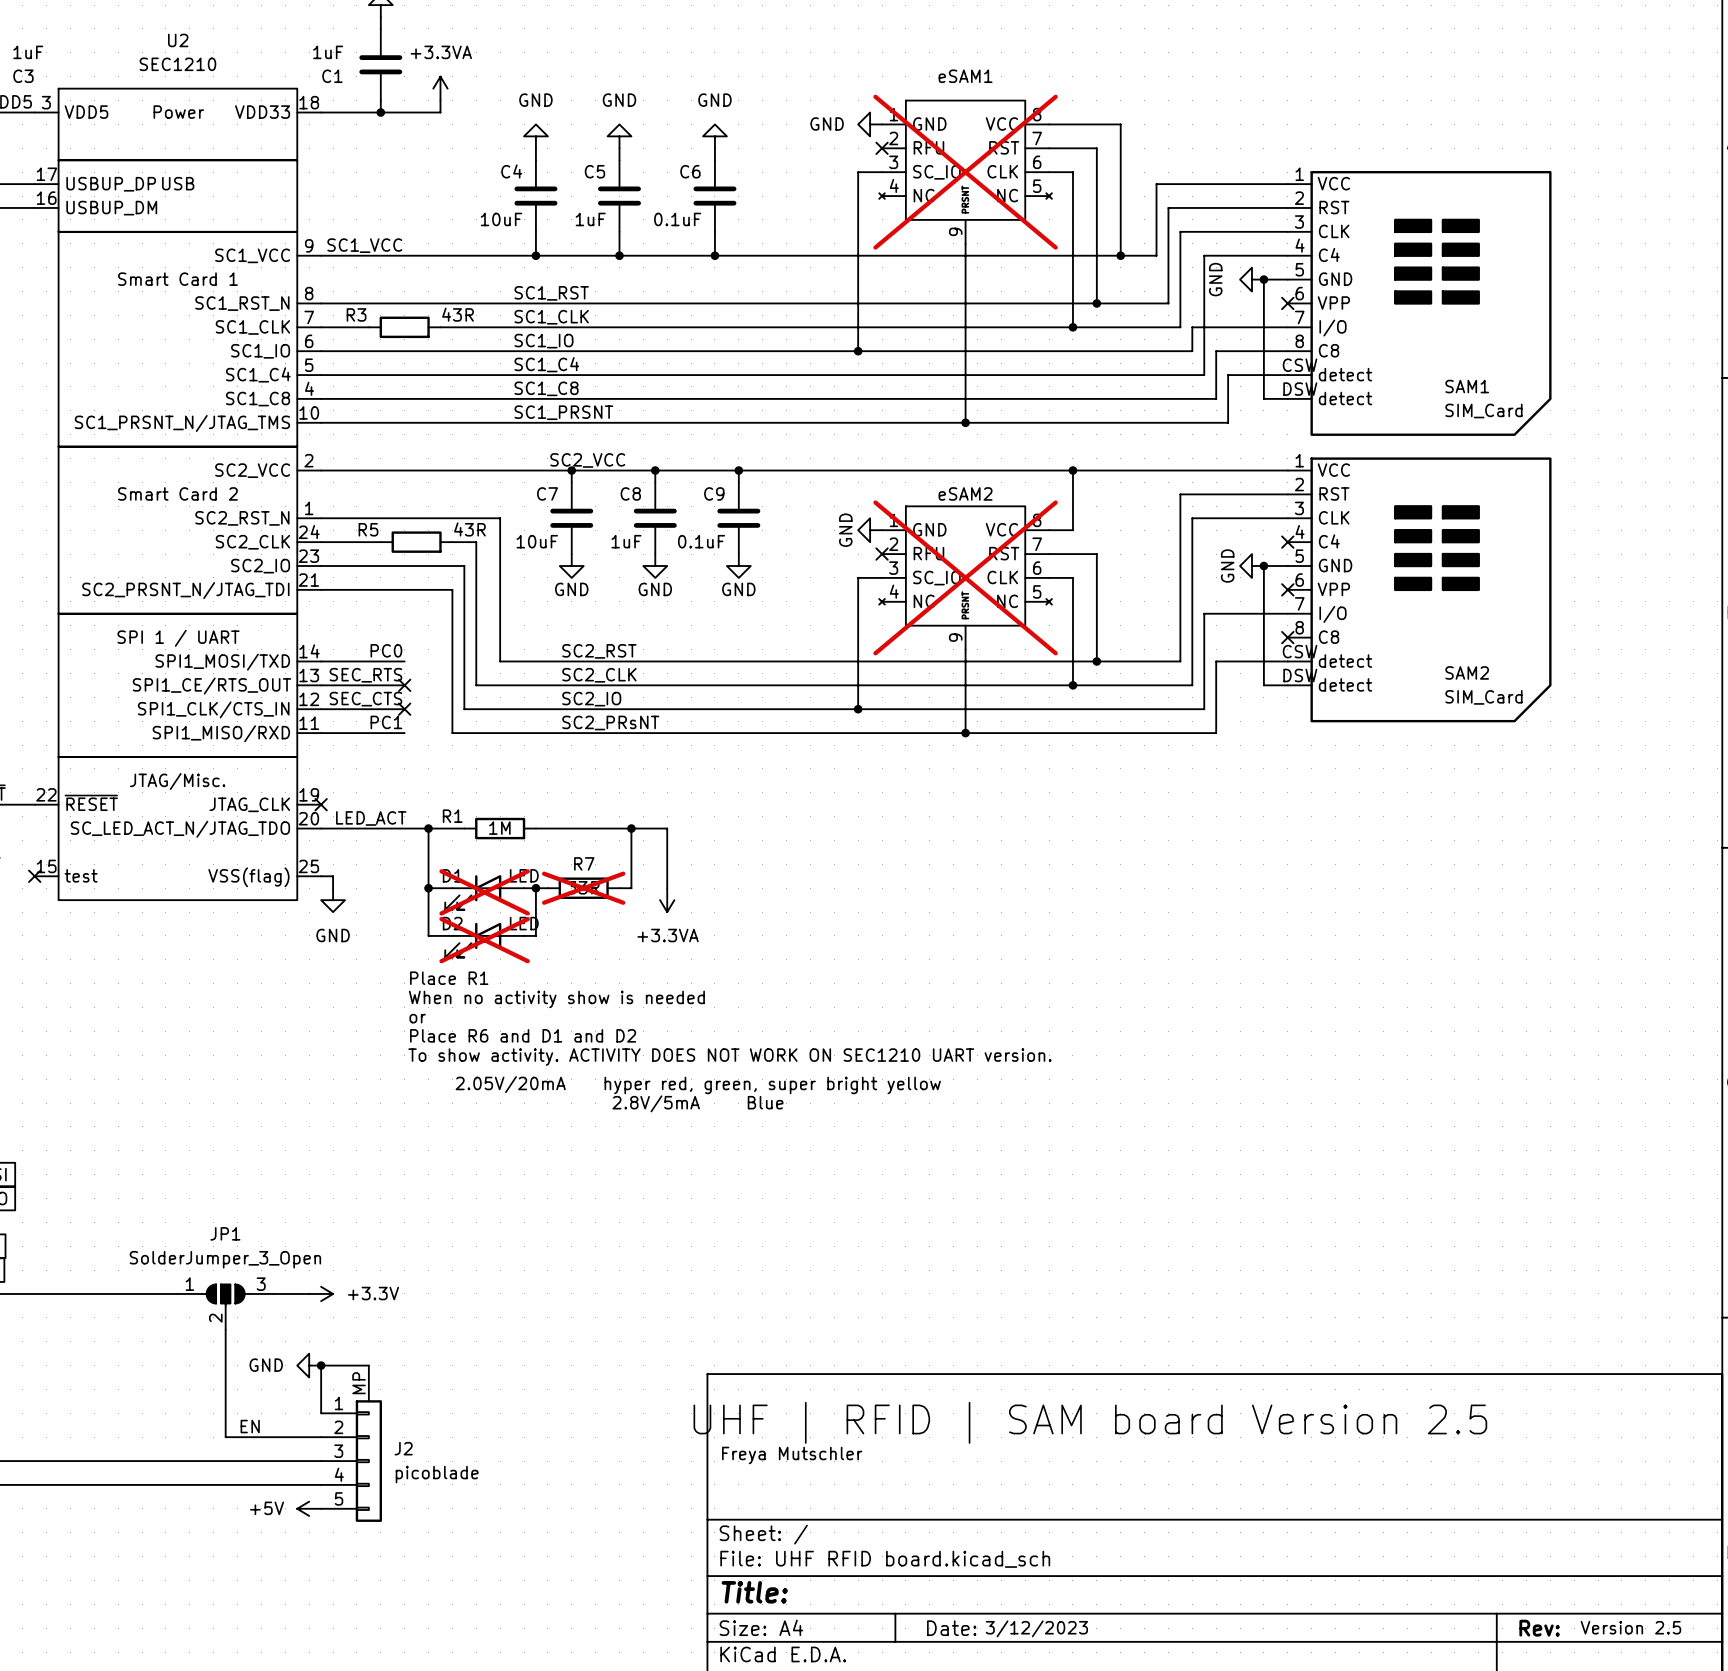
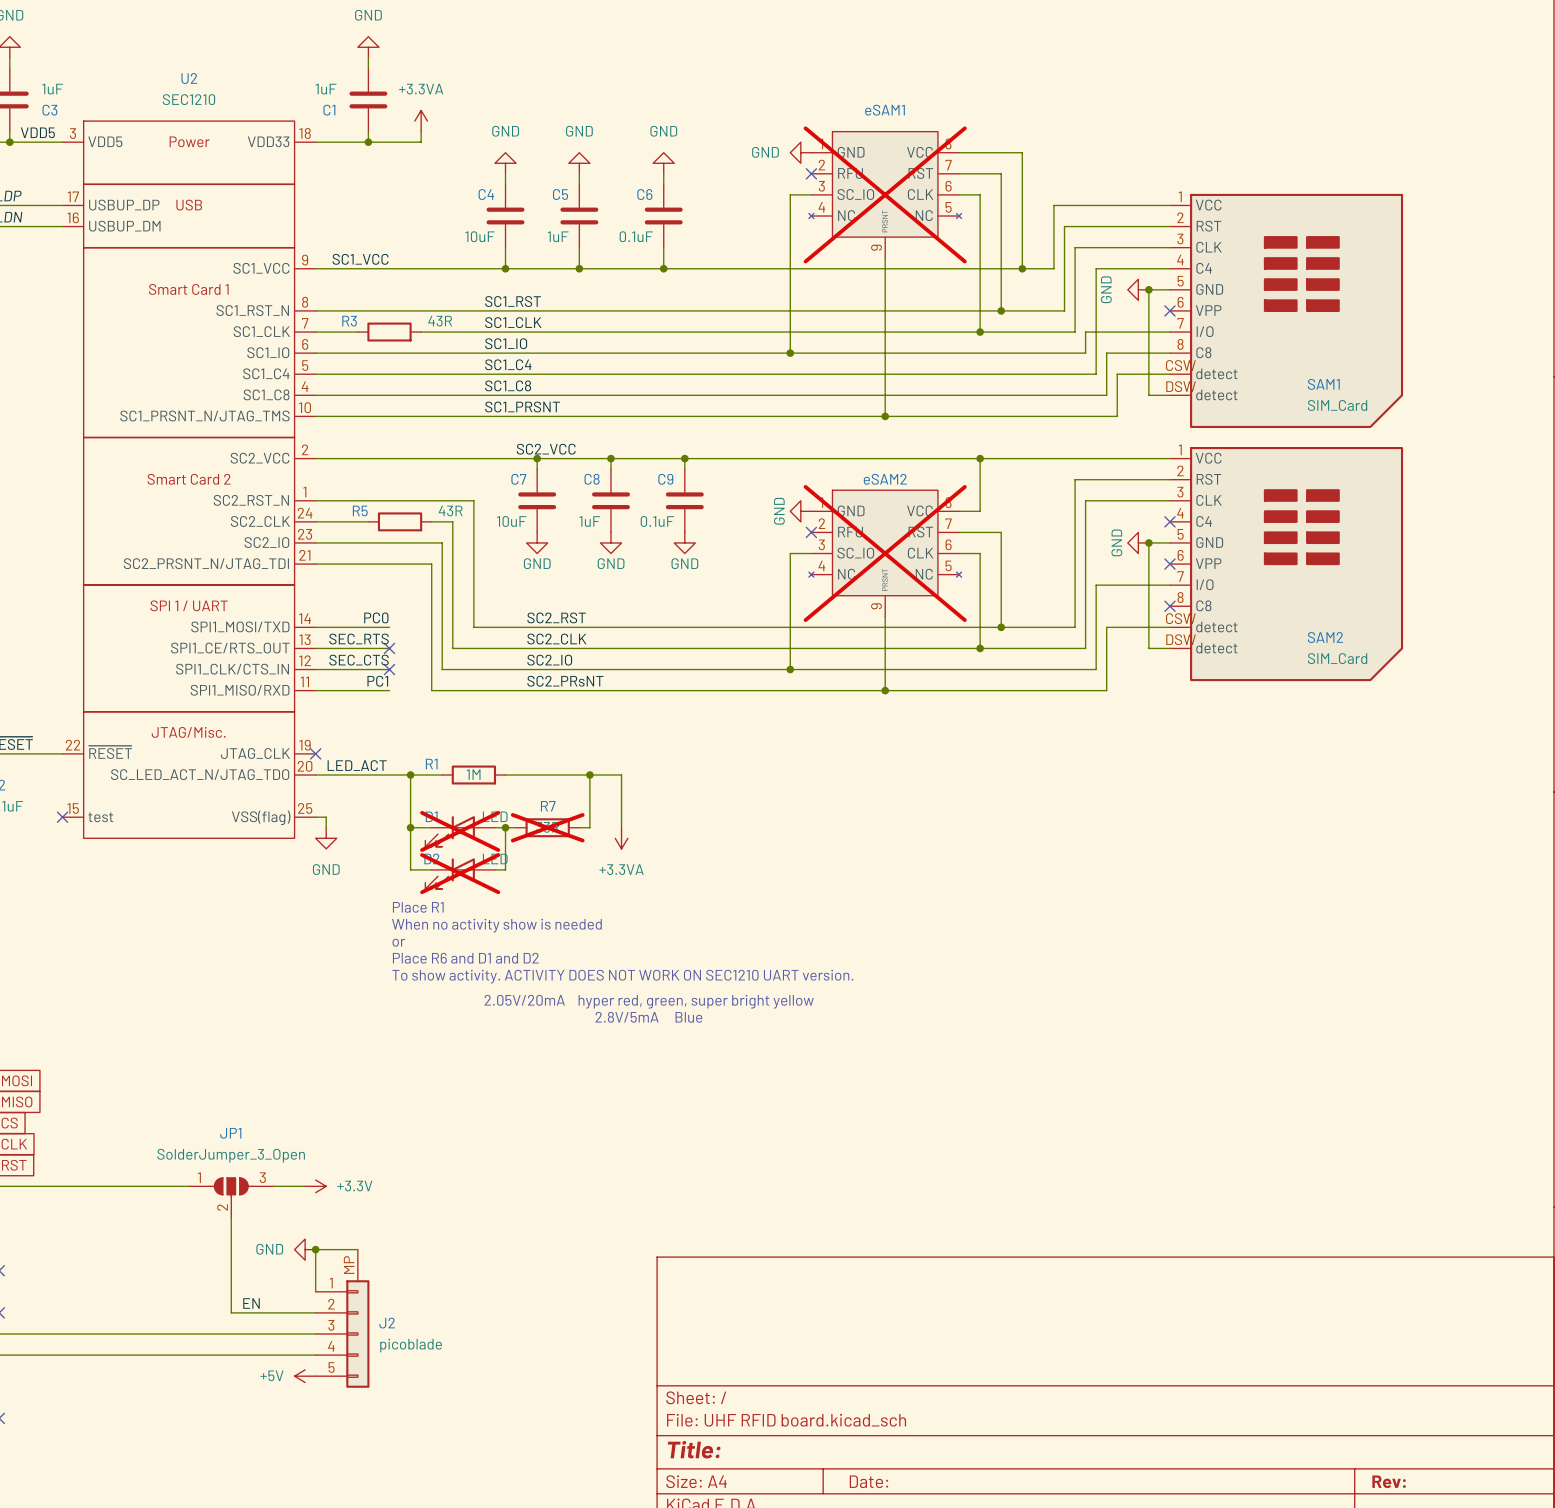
text: UHF | RFID | SAM board Version 2.5 (1090, 1422) -> none
text: Freya Mutschler (792, 1455) -> none
text: Version 2.5 (1630, 1627) -> none
text: 3/12/2023 (1036, 1628) -> none

